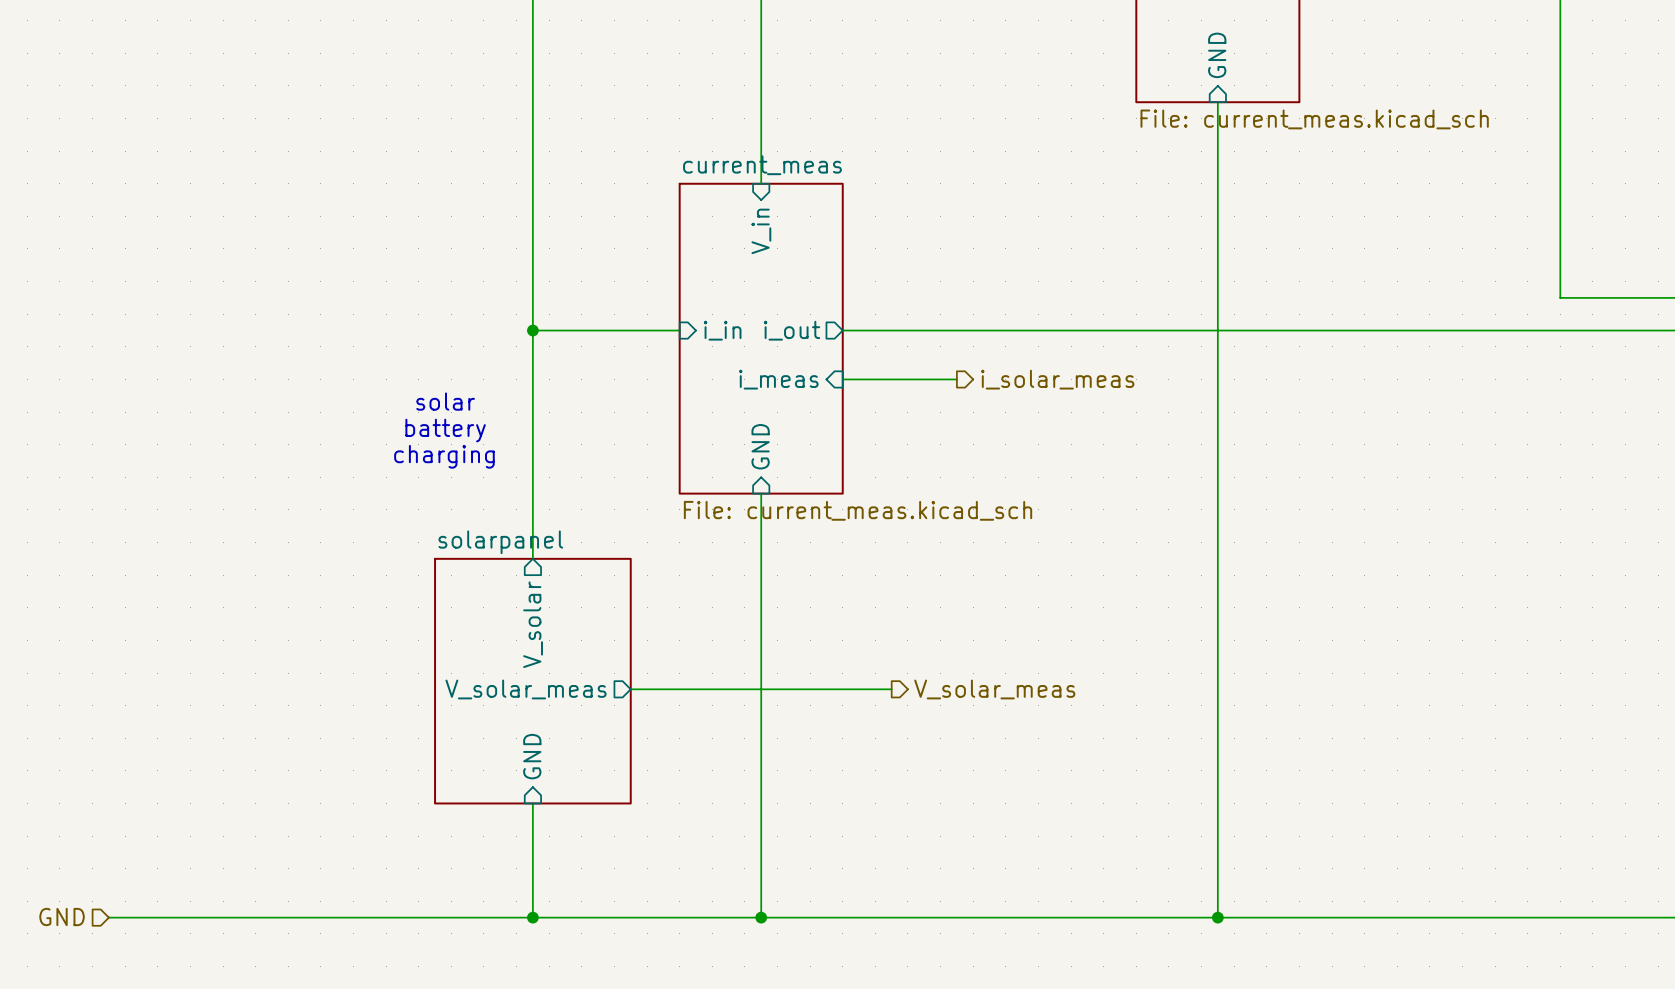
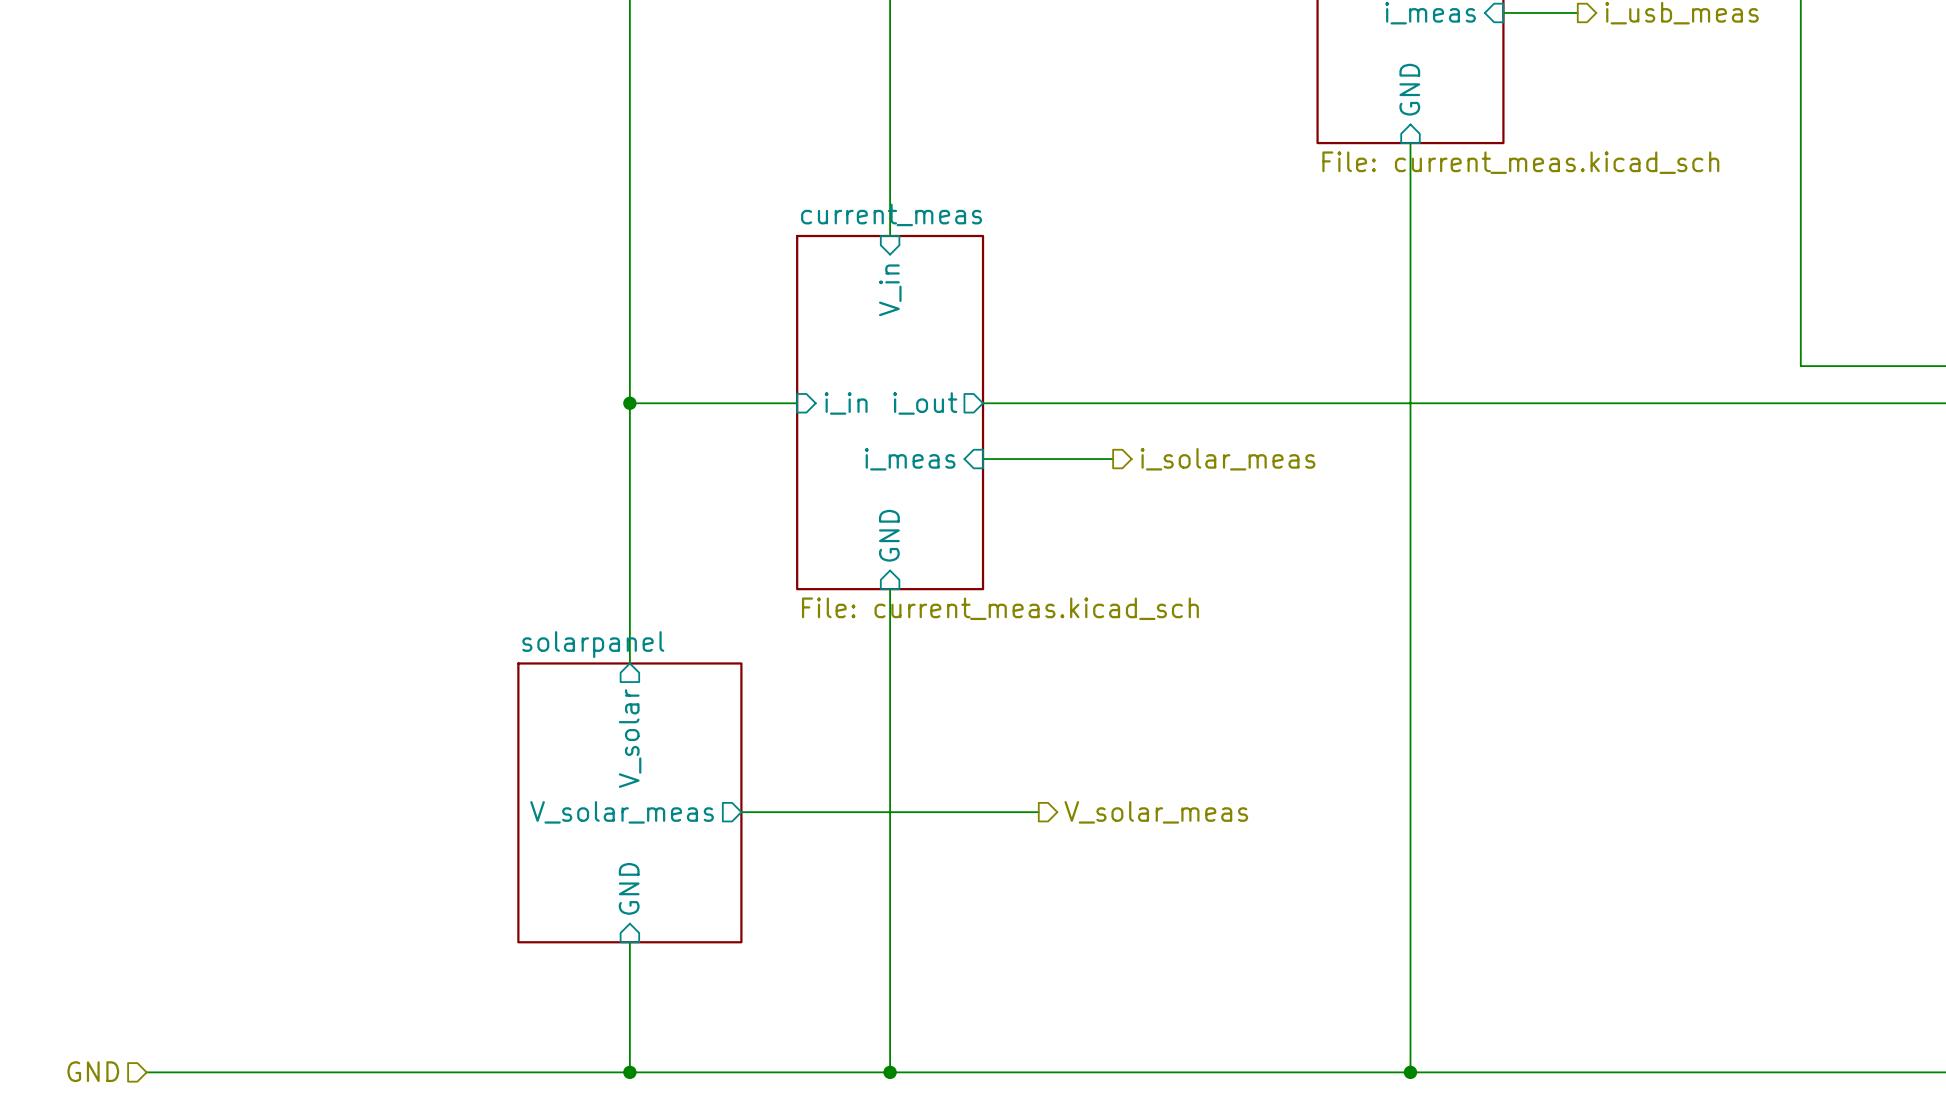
text: solar (445, 401) -> none
text: battery (445, 430) -> none
text: charging (444, 456) -> none

